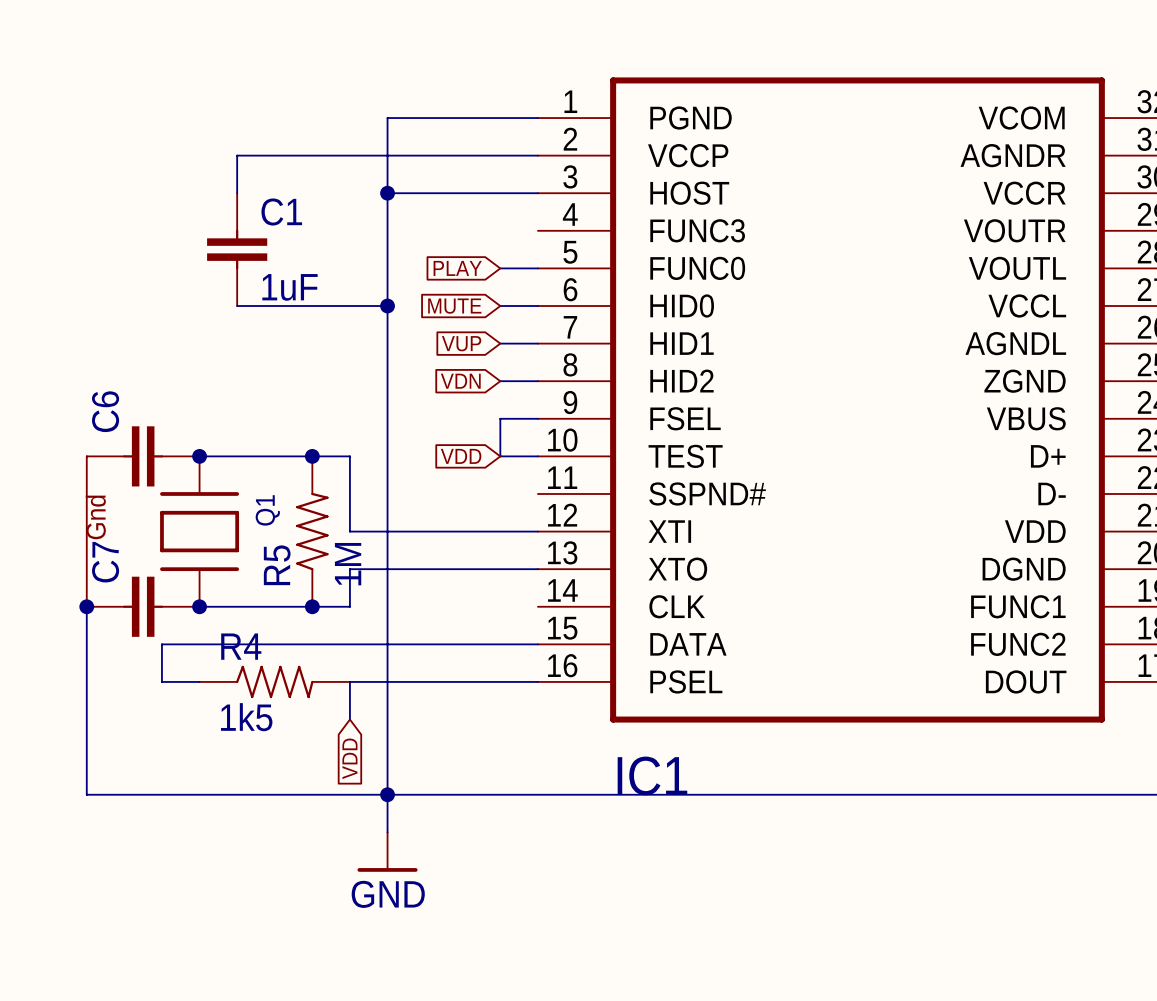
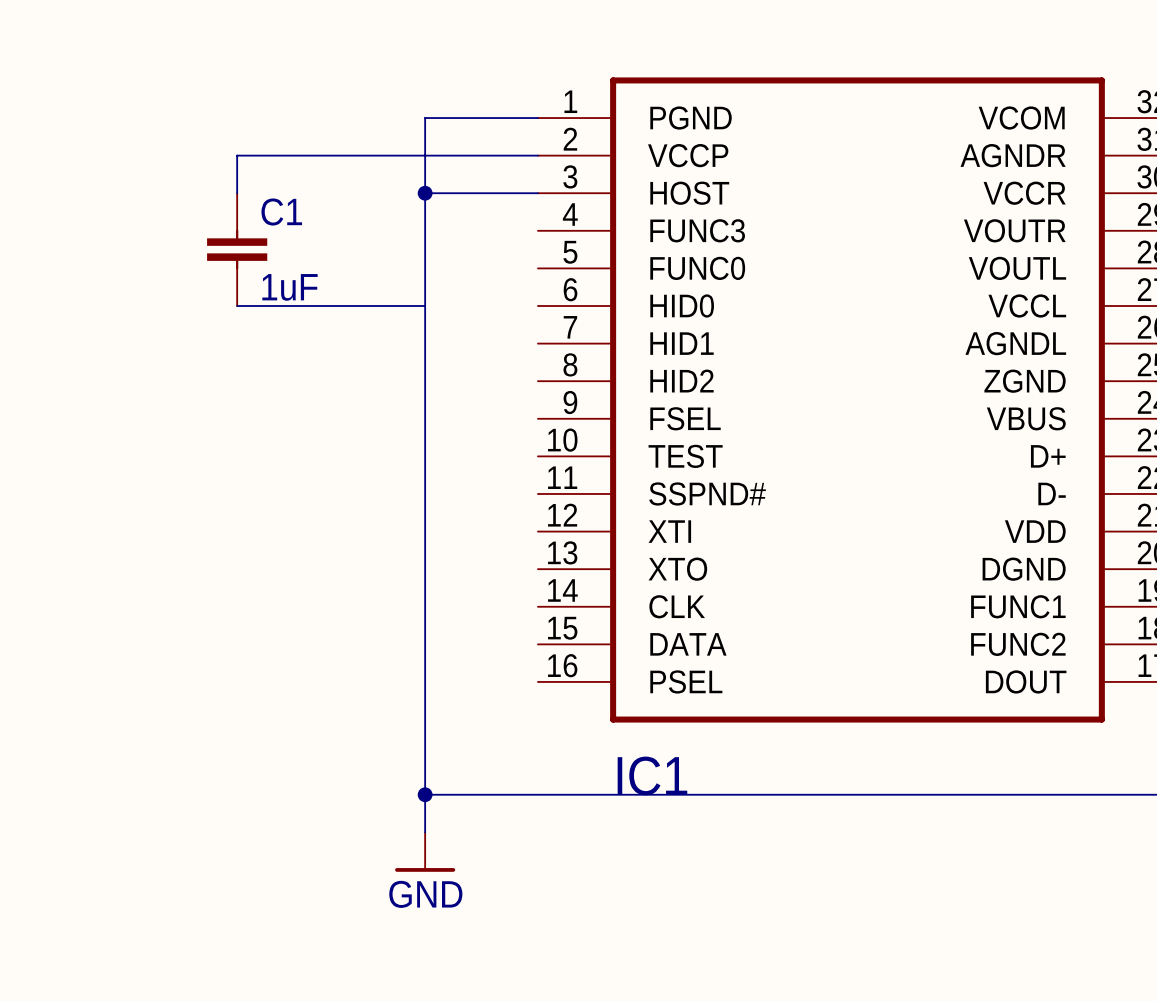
wire: (425, 118) (387, 118) (387, 832) -> (425, 118) (425, 832)
wire: (387, 193) (425, 193) -> none
junction position: (387, 193) -> (425, 193)
global label: PLAY (457, 268) -> none
wire: (500, 268) (537, 268) -> none
junction: (387, 306) -> none
global label: MUTE (454, 306) -> none
wire: (500, 306) (537, 306) -> (387, 306) (425, 306)
global label: VUP (461, 343) -> none
wire: (500, 343) (537, 343) -> none
global label: VDN (460, 381) -> none
wire: (500, 381) (537, 381) -> none
wire: (537, 418) (500, 418) (500, 456) (537, 456) -> none
C6: (143, 456) -> none
wire: (199, 456) (349, 456) (349, 531) (537, 531) -> none
junction: (199, 456) -> none
junction: (312, 456) -> none
global label: VDD (461, 456) -> none
Q1: (162, 531) -> none
R5: 1M (312, 531) -> none
wire: (537, 569) (349, 569) (349, 606) (199, 606) -> none
wire: (86, 606) (86, 794) (425, 794) -> none
junction: (86, 606) -> none
C7: (143, 606) -> none
junction: (199, 606) -> none
junction: (312, 606) -> none
wire: (537, 644) (161, 644) (161, 681) (199, 681) -> none
R4: 1k5 (274, 681) -> none
wire: (537, 681) (349, 681) (349, 719) -> none
global label: VDD (349, 758) -> none
junction position: (387, 794) -> (425, 794)
power symbol position: GND (387, 852) -> GND (425, 852)

